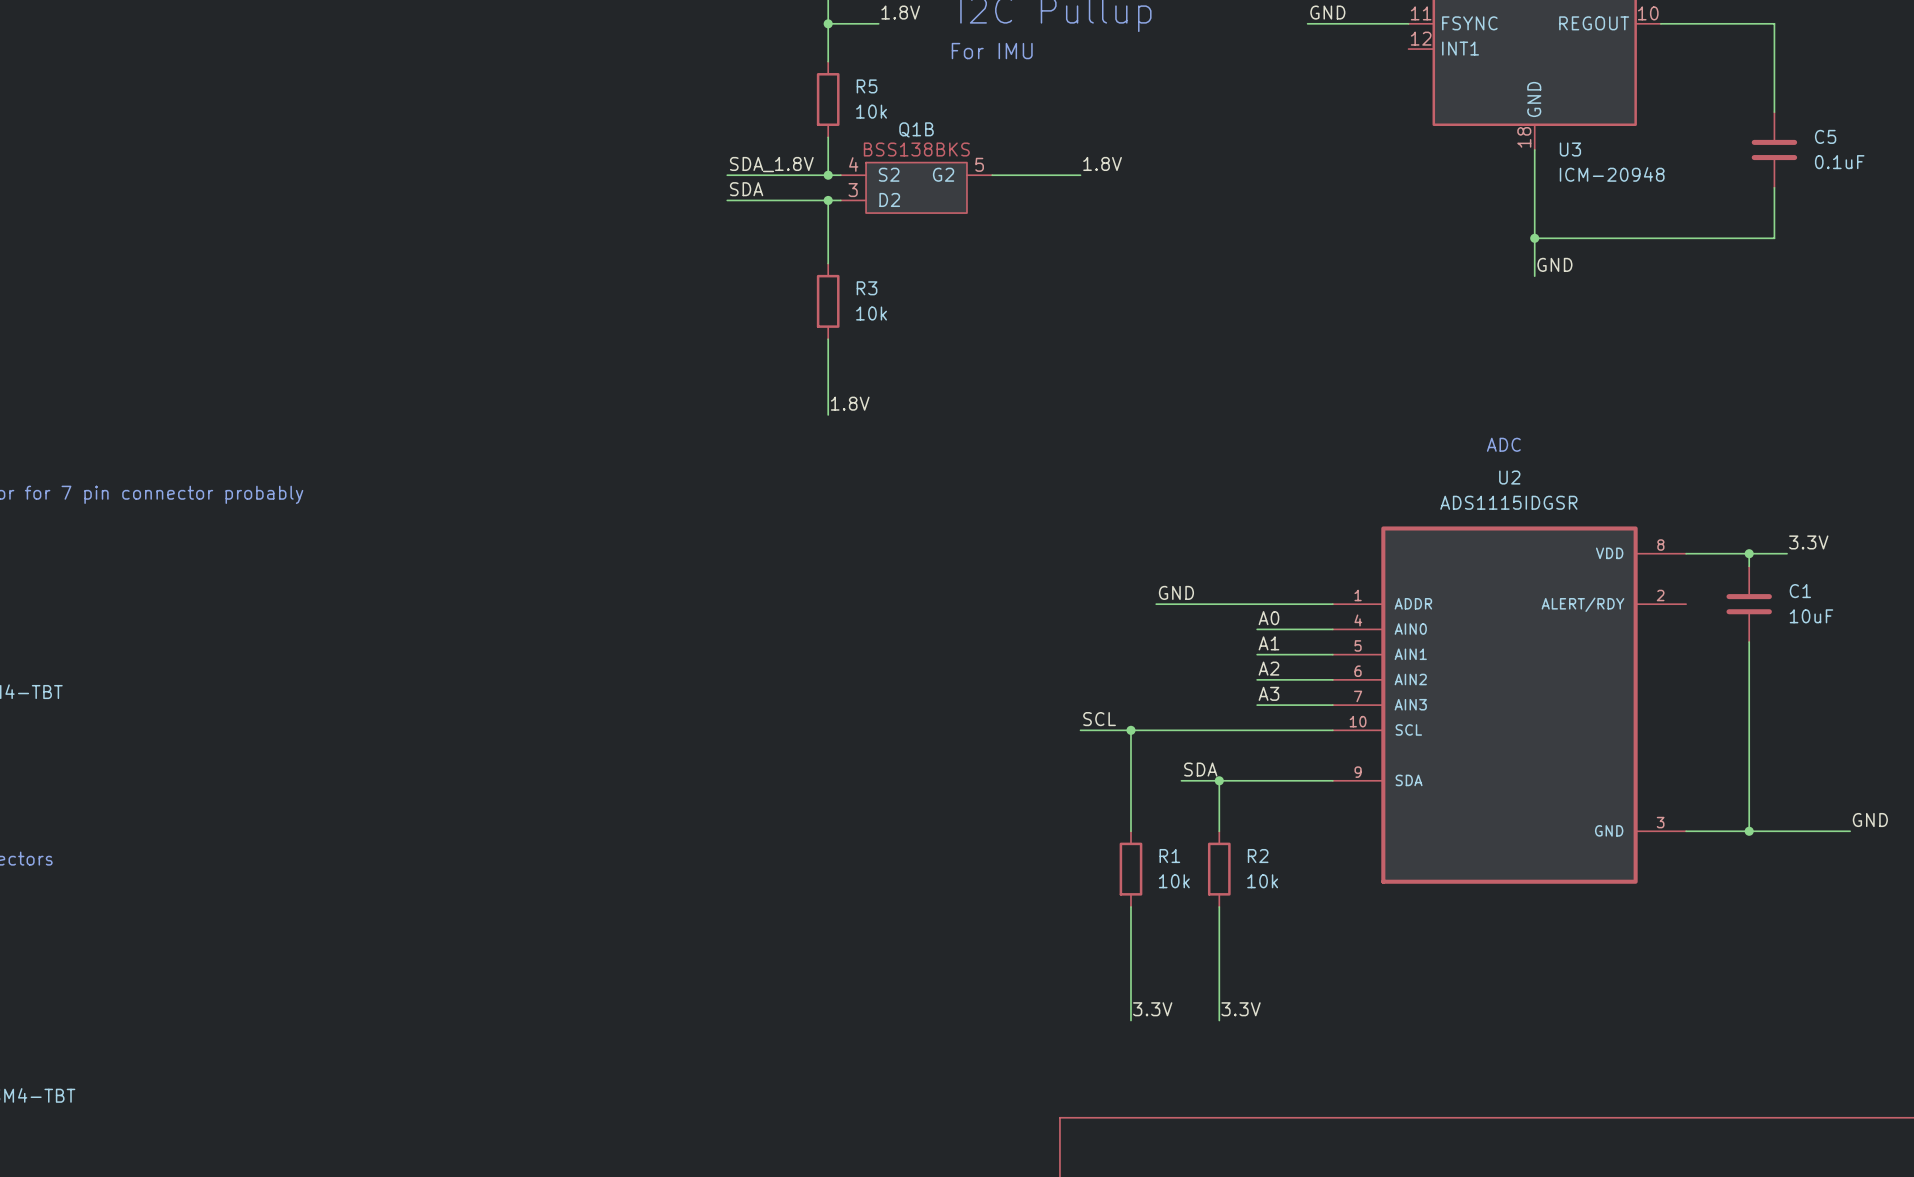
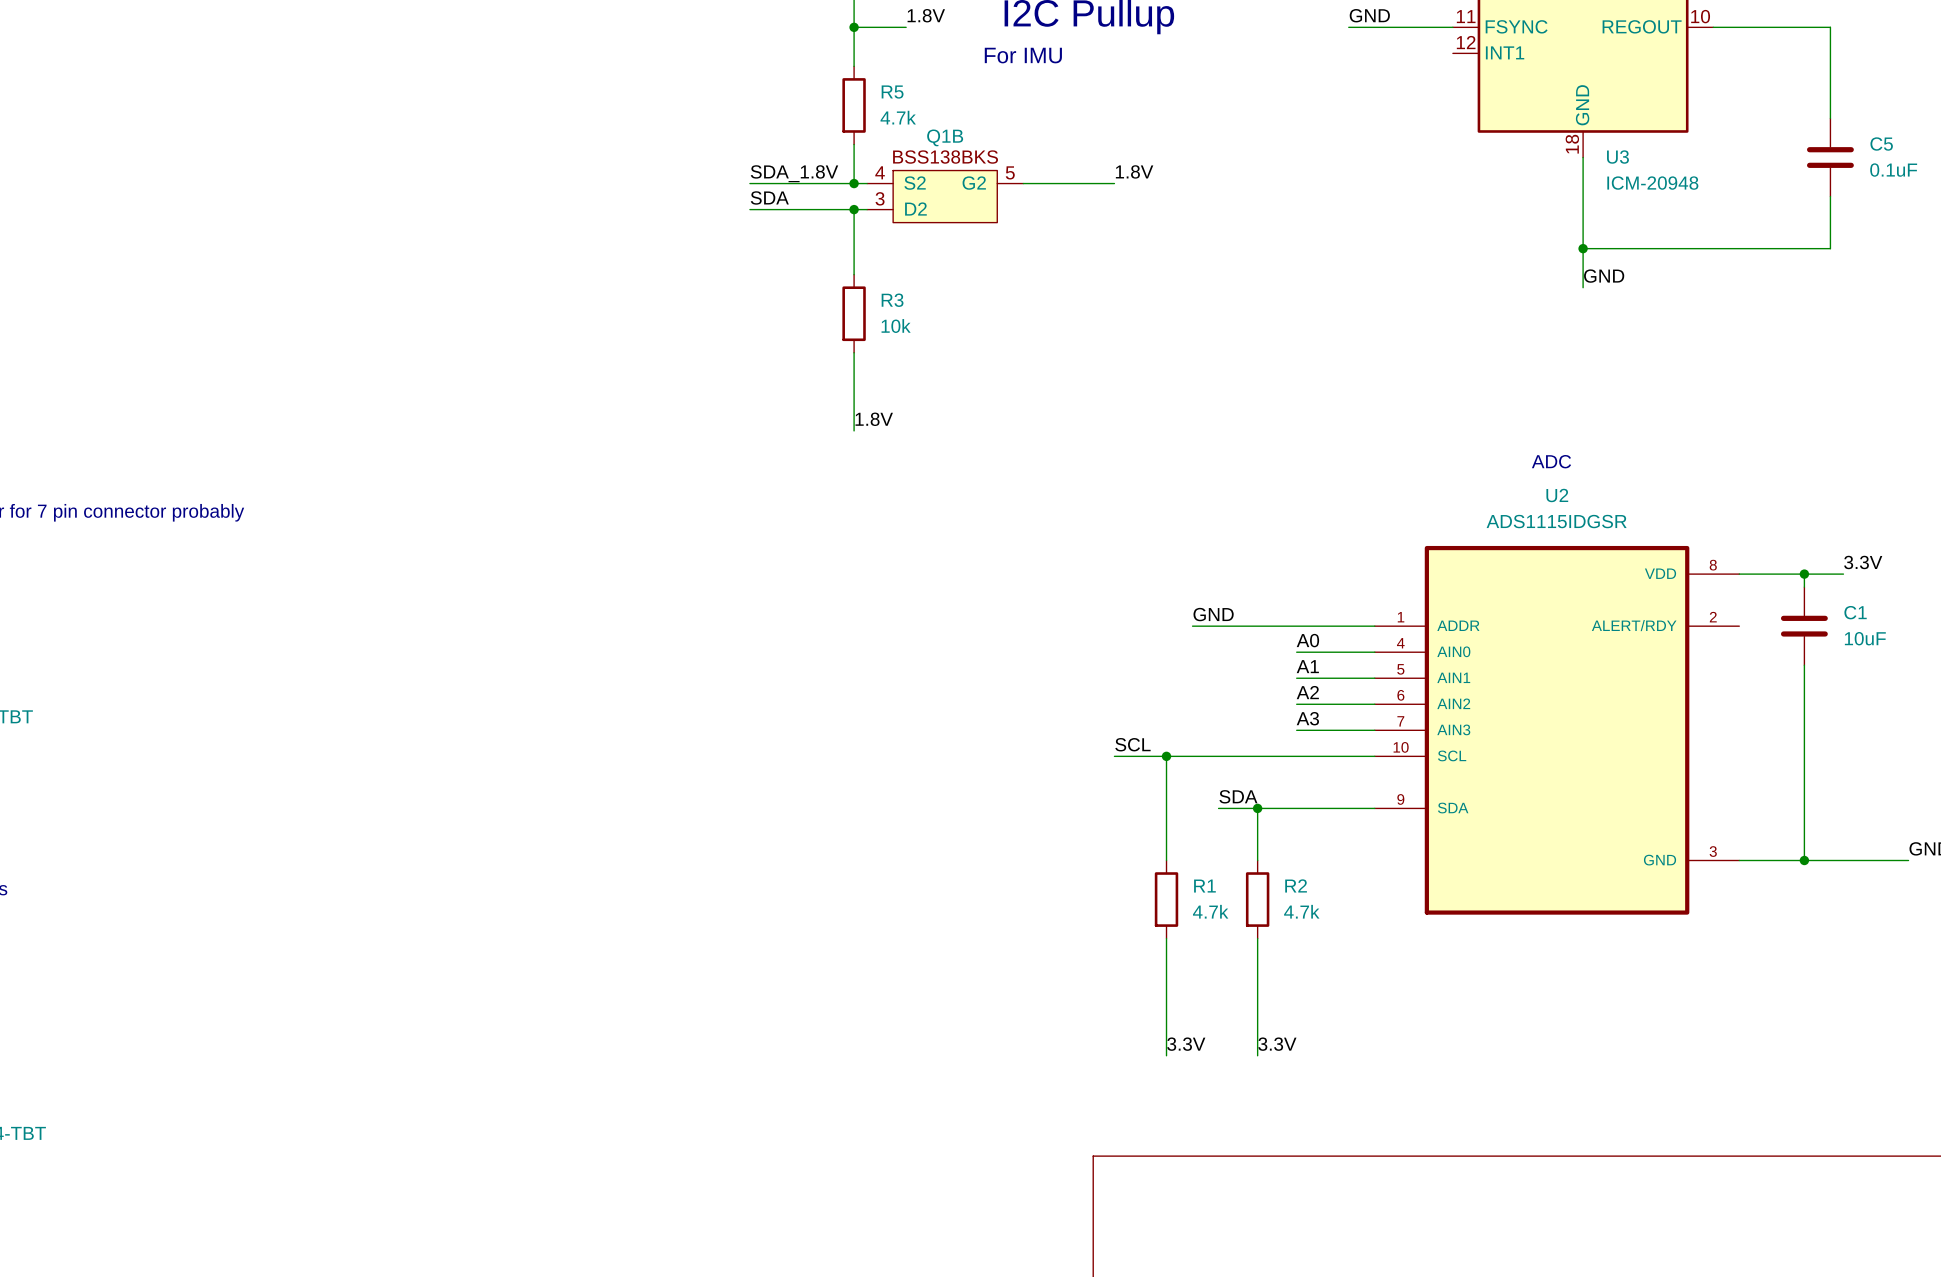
R5 value: 10k (871, 111) -> 4.7k (898, 117)
R1 value: 10k (1174, 881) -> 4.7k (1210, 911)
R2 value: 10k (1262, 881) -> 4.7k (1301, 911)

